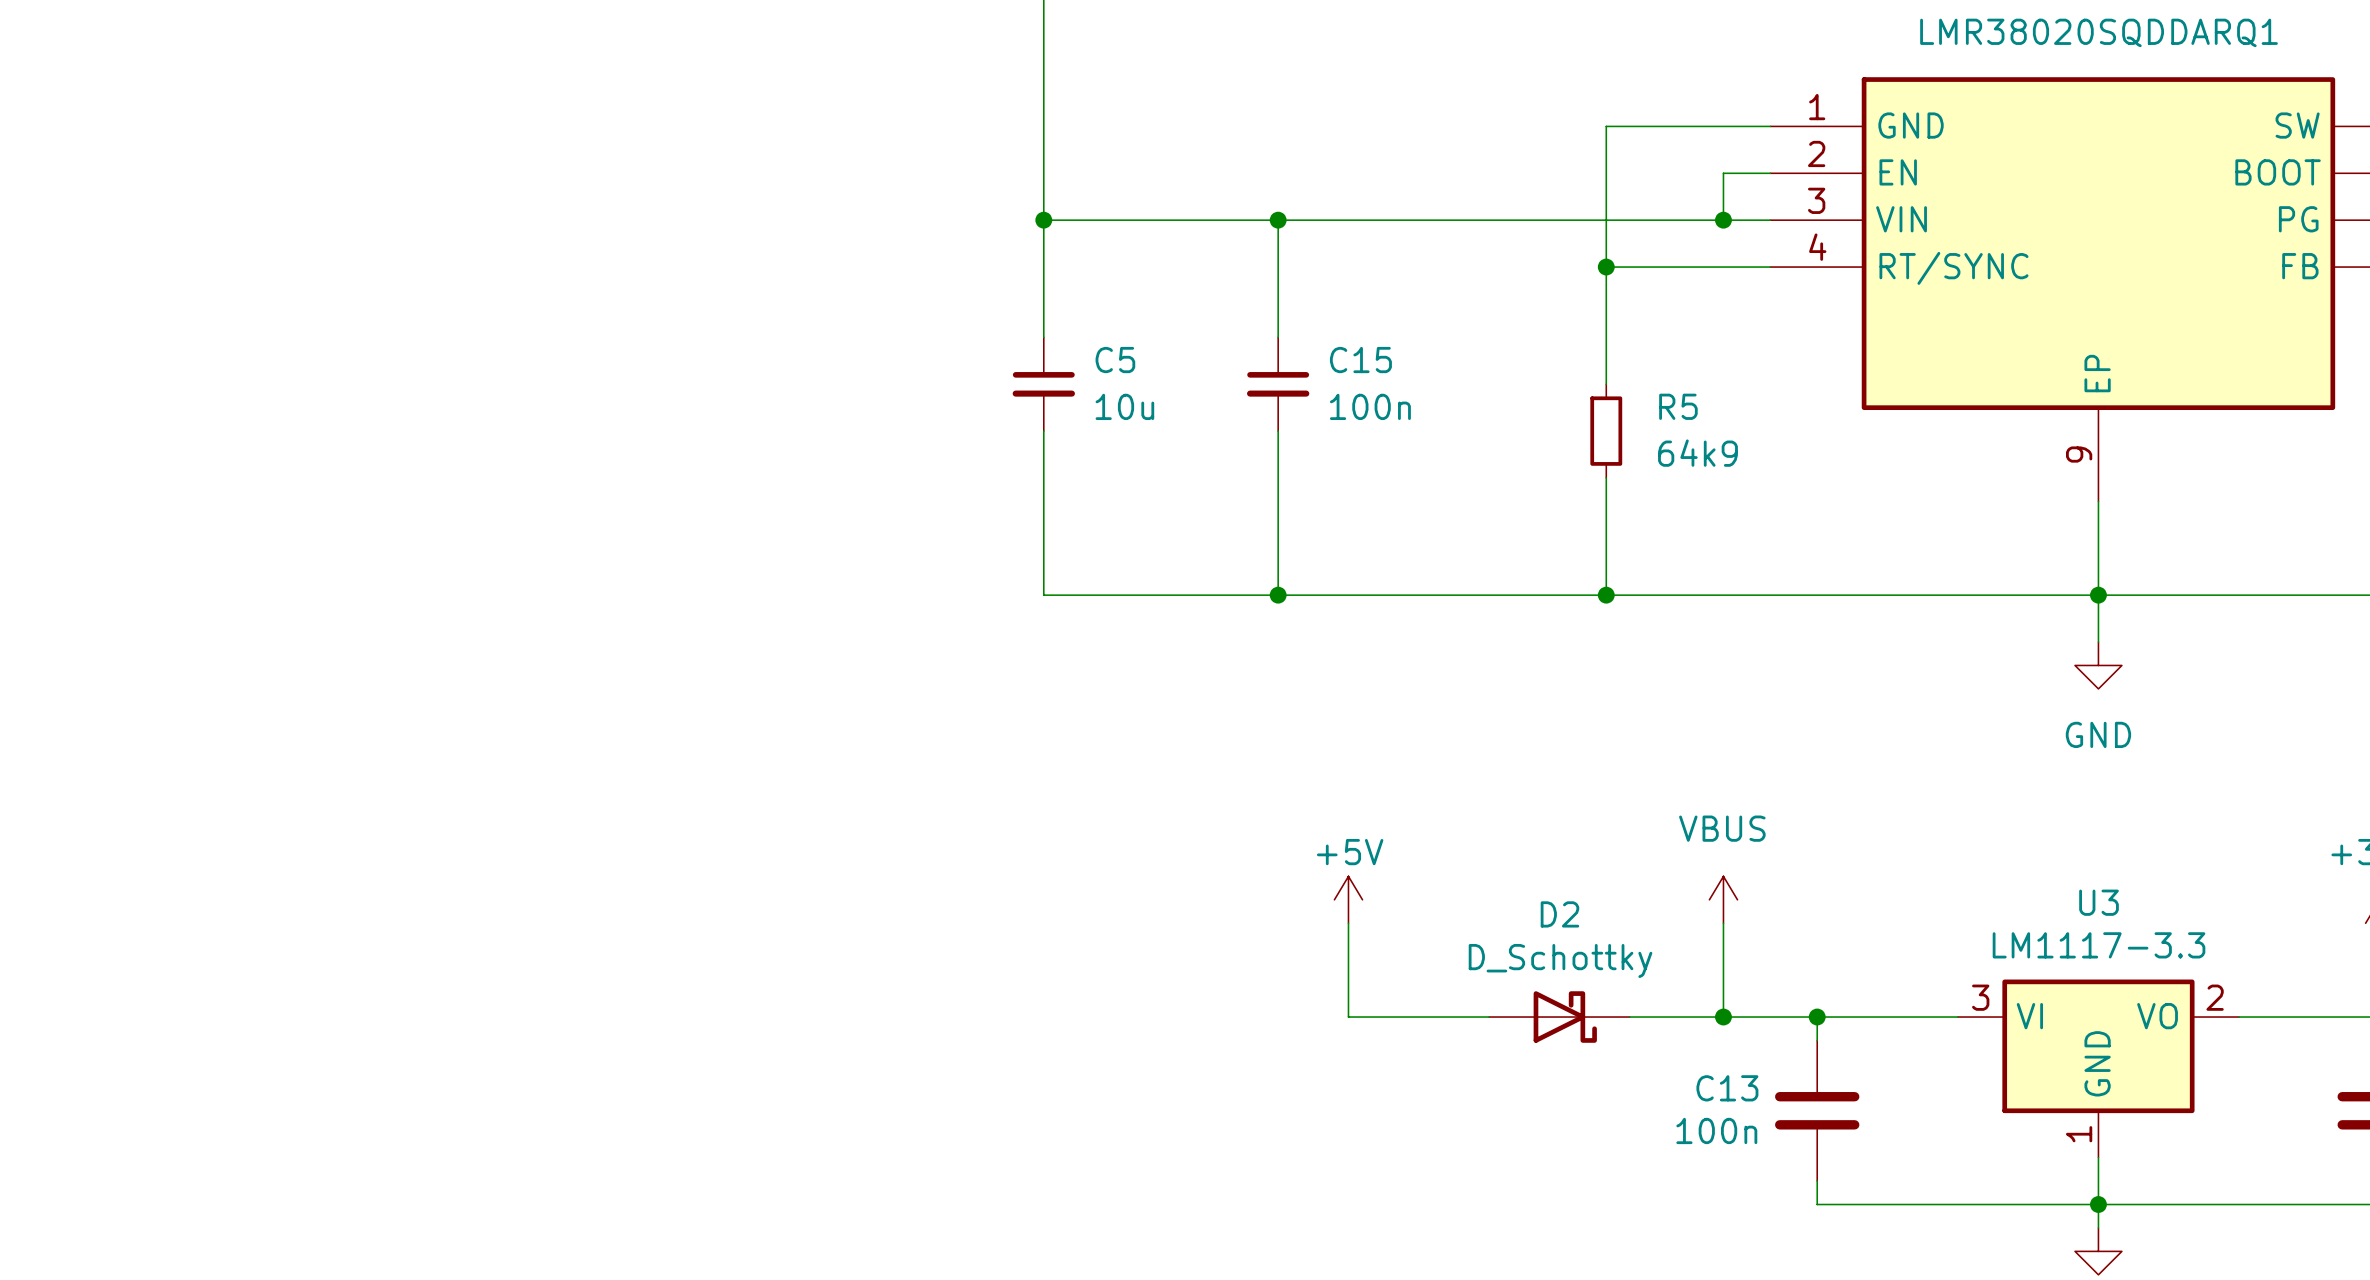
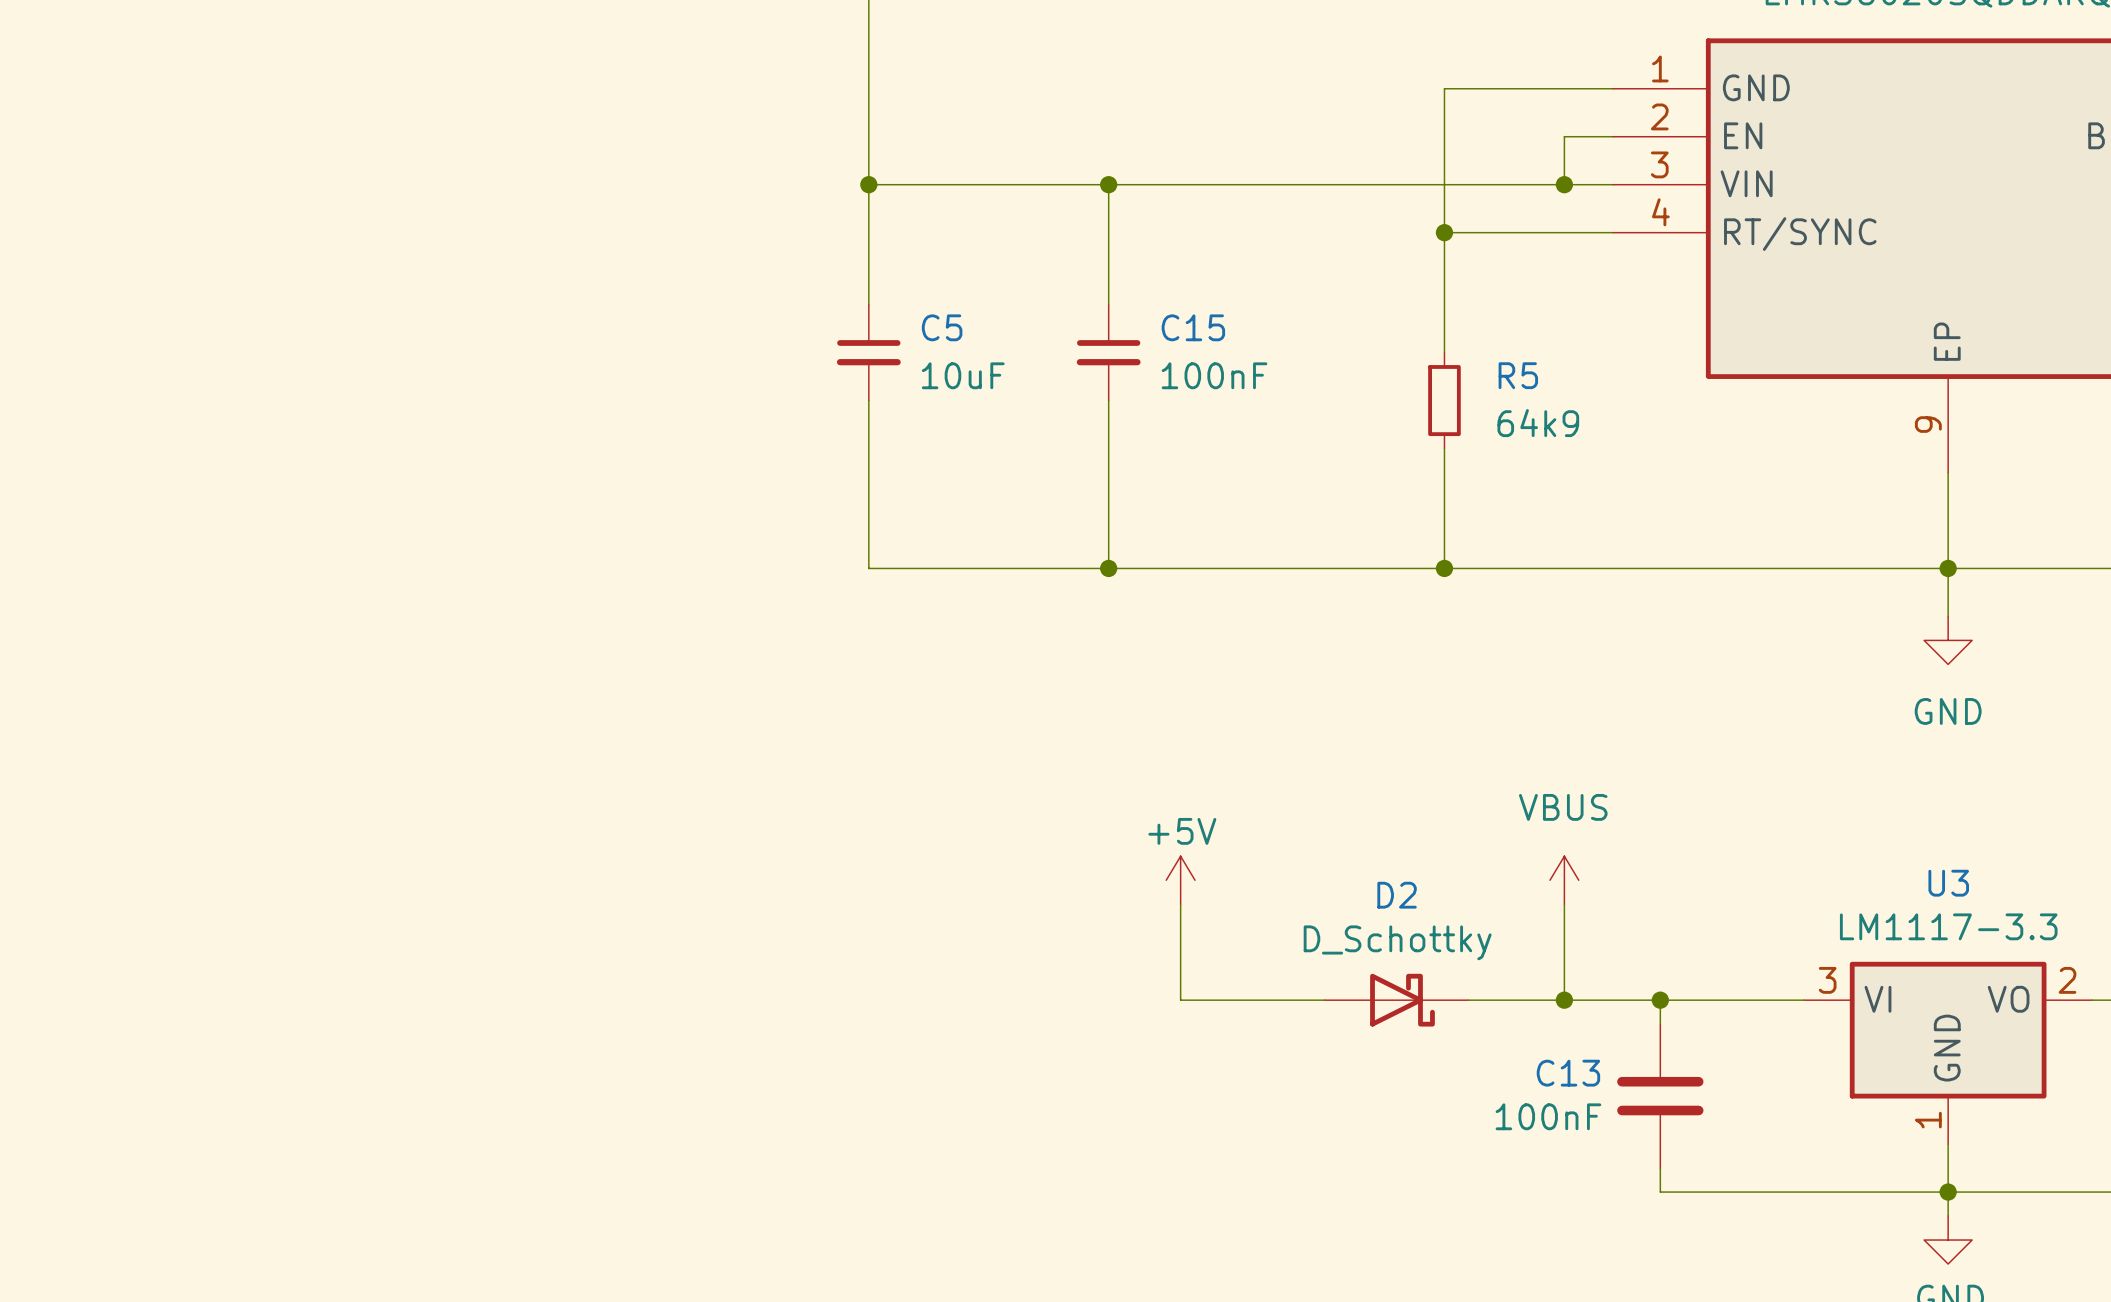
C5 value: 10u (1124, 406) -> 10uF (963, 375)
C15 value: 100n (1370, 406) -> 100nF (1214, 375)
C13 value: 100n (1716, 1130) -> 100nF (1548, 1116)

